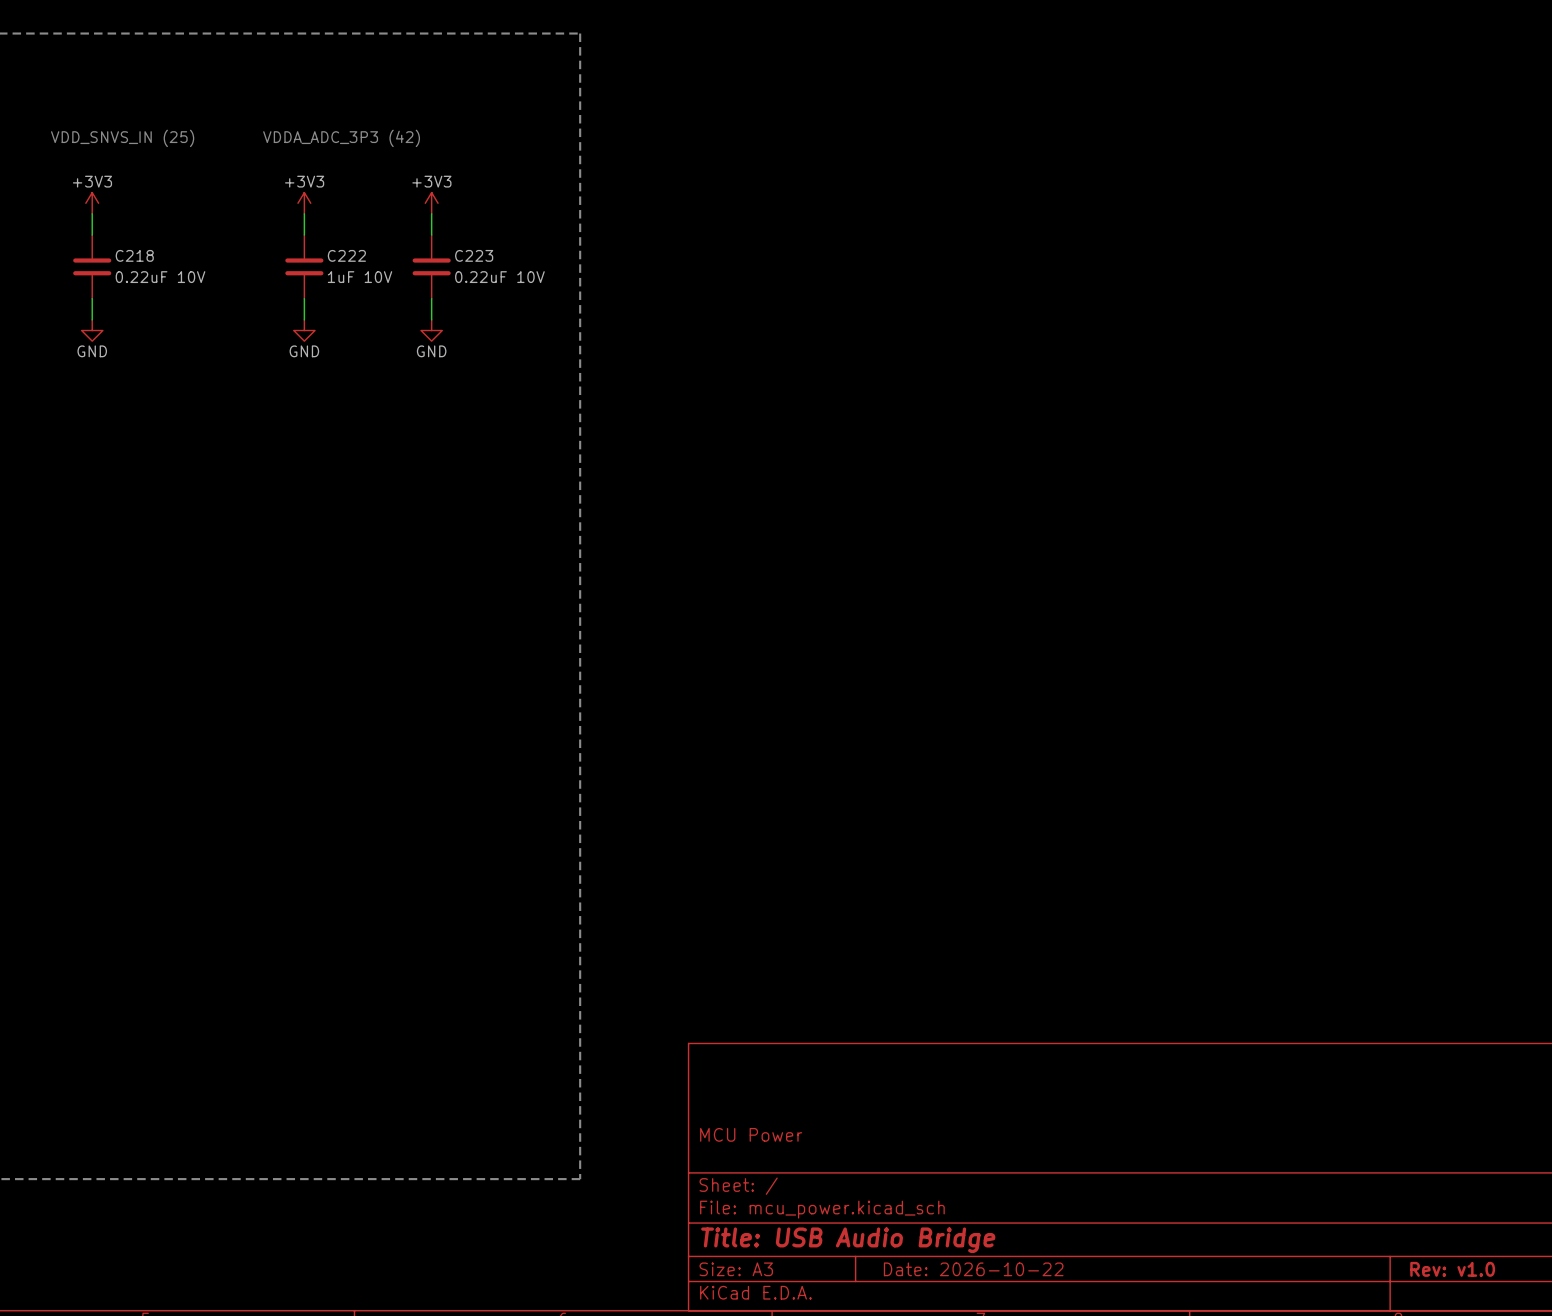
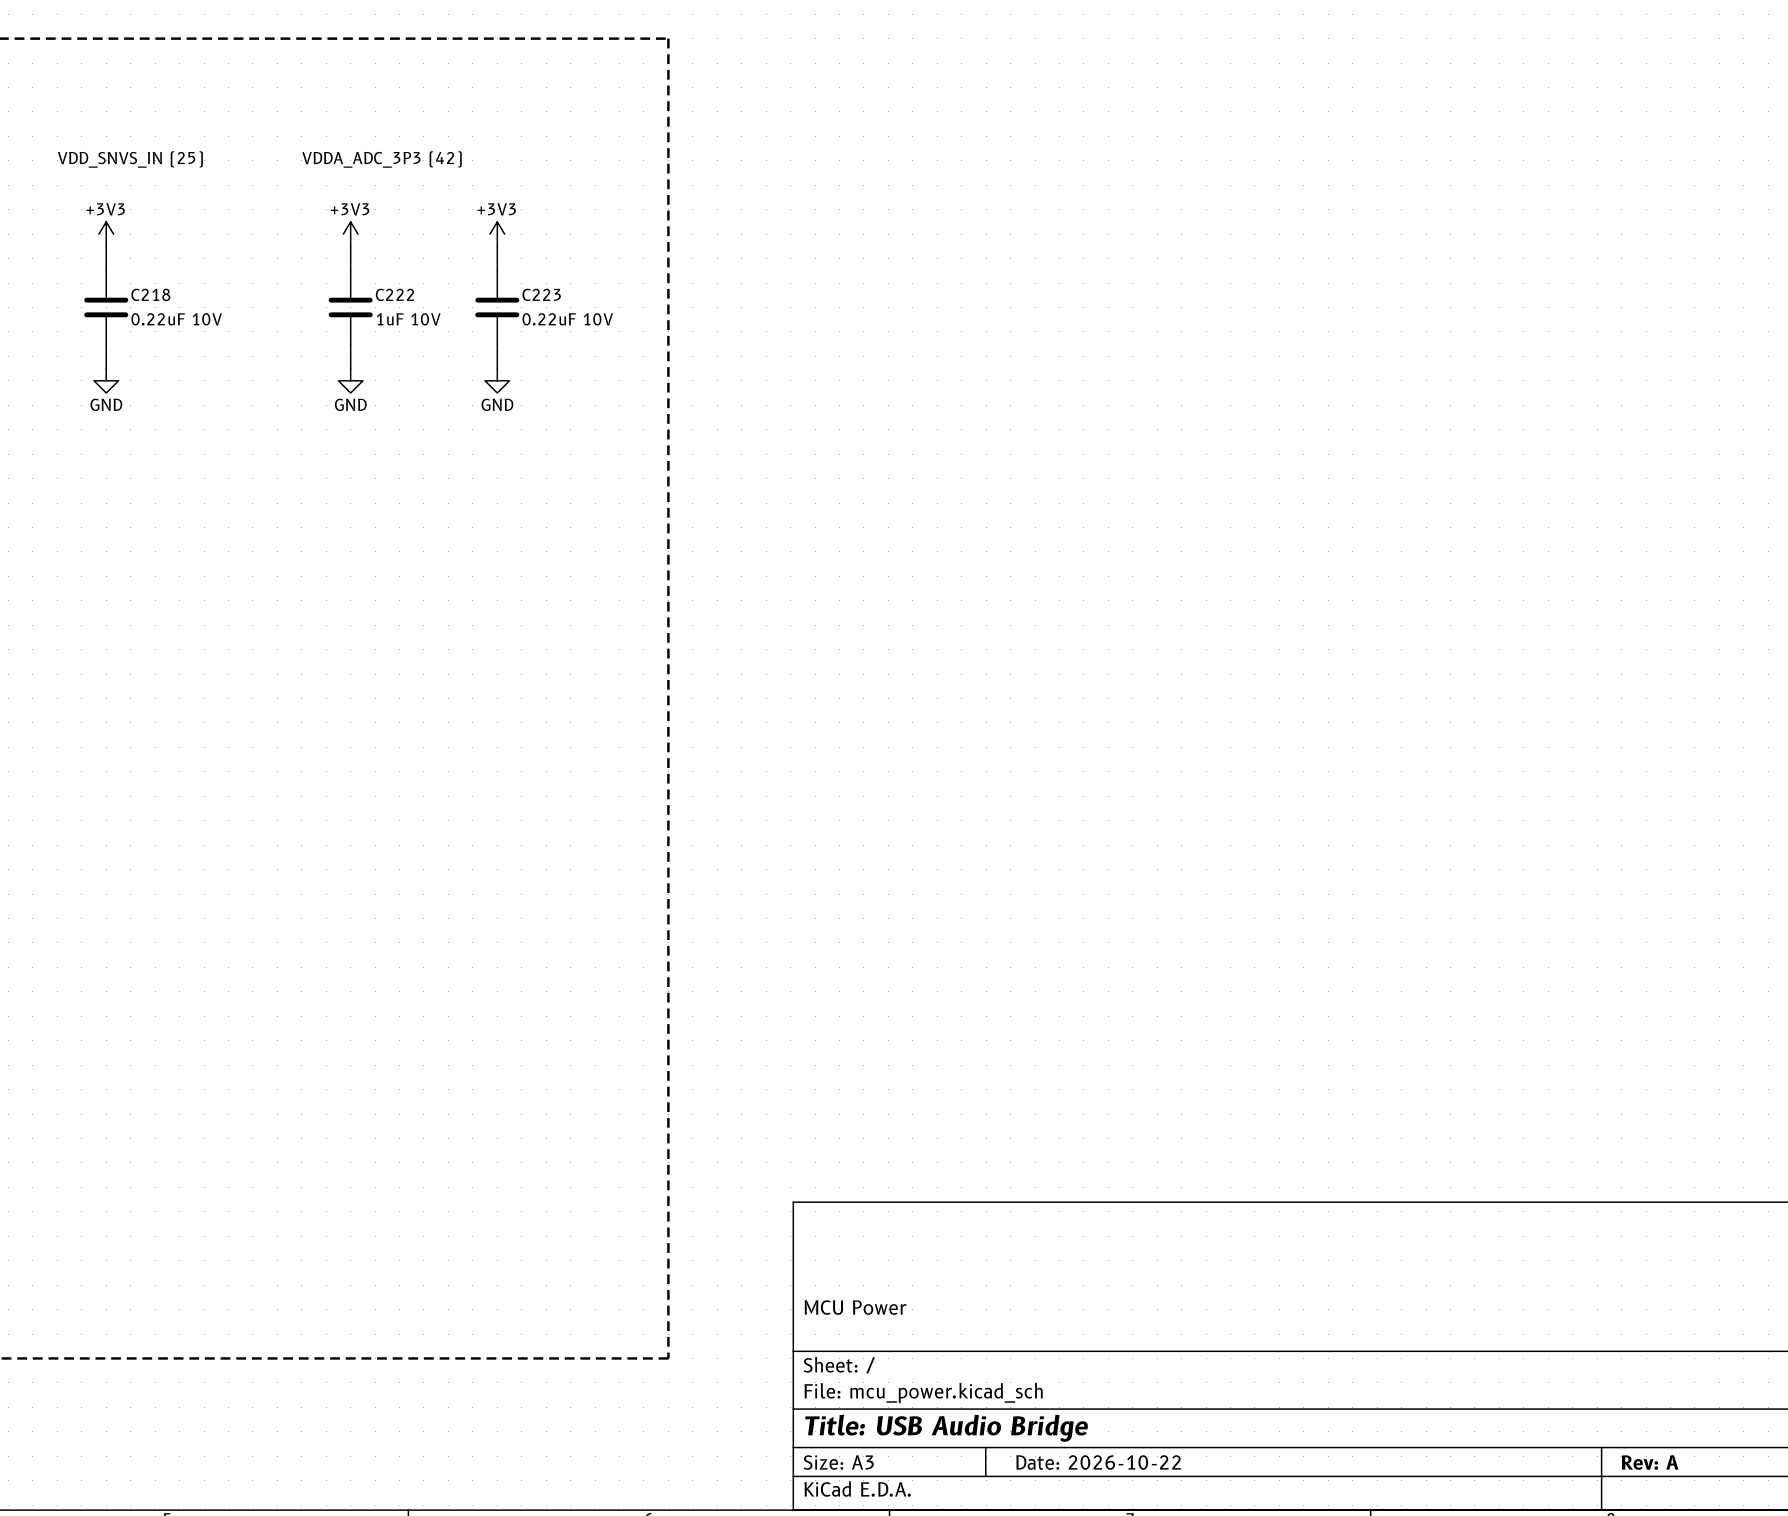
title block: Rev: v1.0 (1452, 1269) -> Rev: A (1650, 1462)

